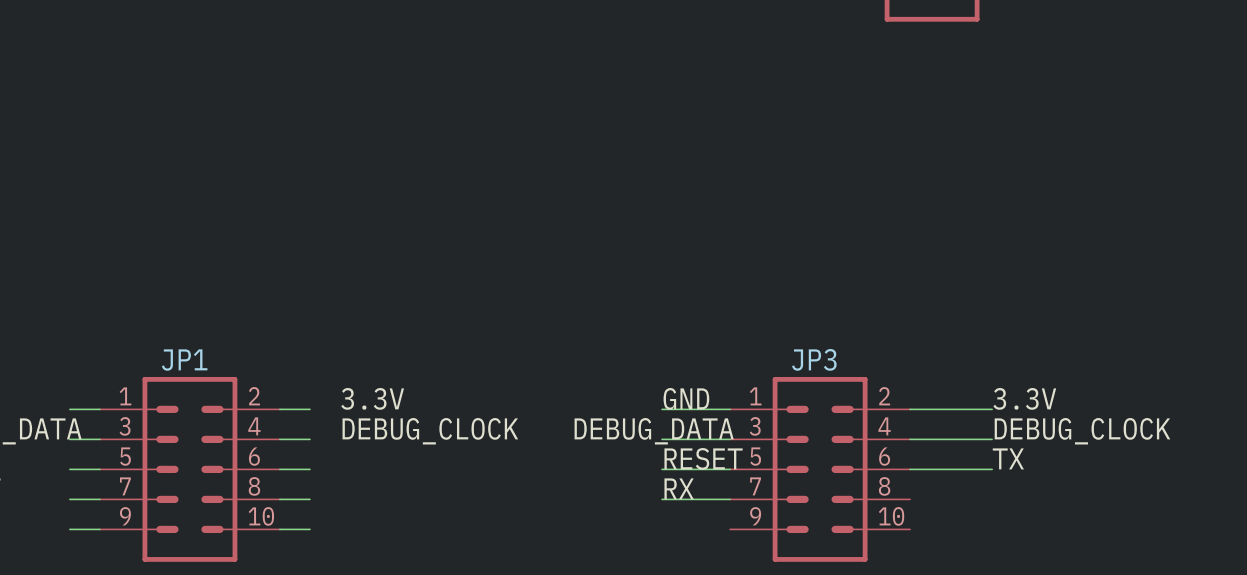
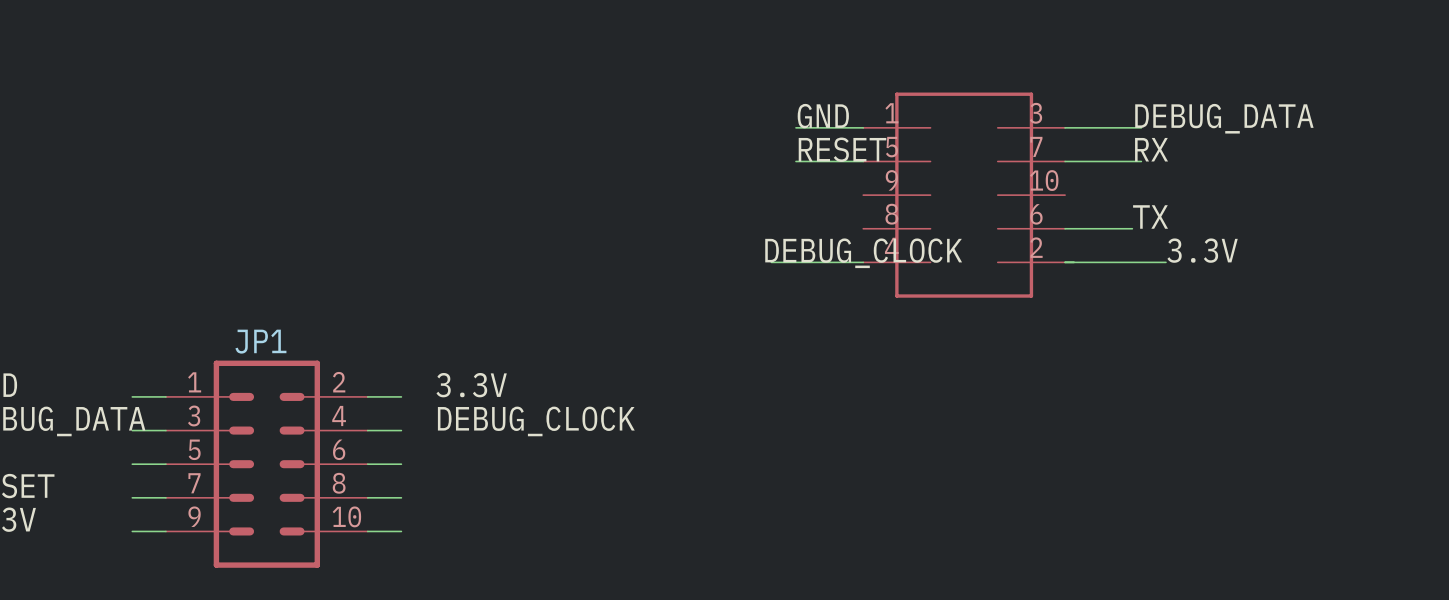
label: none -> DEBUG_DATA (1224, 118)
wire: none -> (795, 127) (863, 127)
wire: none -> (1065, 127) (1141, 127)
label: none -> RX (1151, 149)
wire: none -> (795, 161) (863, 161)
wire: none -> (1065, 161) (1141, 161)
part: none -> (964, 195)
wire: none -> (1065, 228) (1132, 228)
label: none -> DEBUG_CLOCK (863, 253)
wire: none -> (771, 262) (863, 262)
wire: none -> (1065, 262) (1165, 262)
label position: GND (686, 398) -> GND (823, 116)
label position: 3.3V (1024, 398) -> 3.3V (1202, 250)
wire: (662, 409) (730, 409) -> none
wire: (910, 409) (992, 409) -> none
label: DEBUG_DATA (654, 431) -> none
label: DEBUG_CLOCK (1082, 431) -> none
wire: (662, 439) (730, 439) -> none
wire: (910, 439) (992, 439) -> none
label position: RESET (703, 458) -> RESET (842, 149)
label position: TX (1008, 458) -> TX (1150, 216)
wire: (662, 469) (730, 469) -> none
JP3: (820, 469) -> none
wire: (910, 469) (992, 469) -> none
label: RX (679, 488) -> none
wire: (662, 499) (730, 499) -> none

